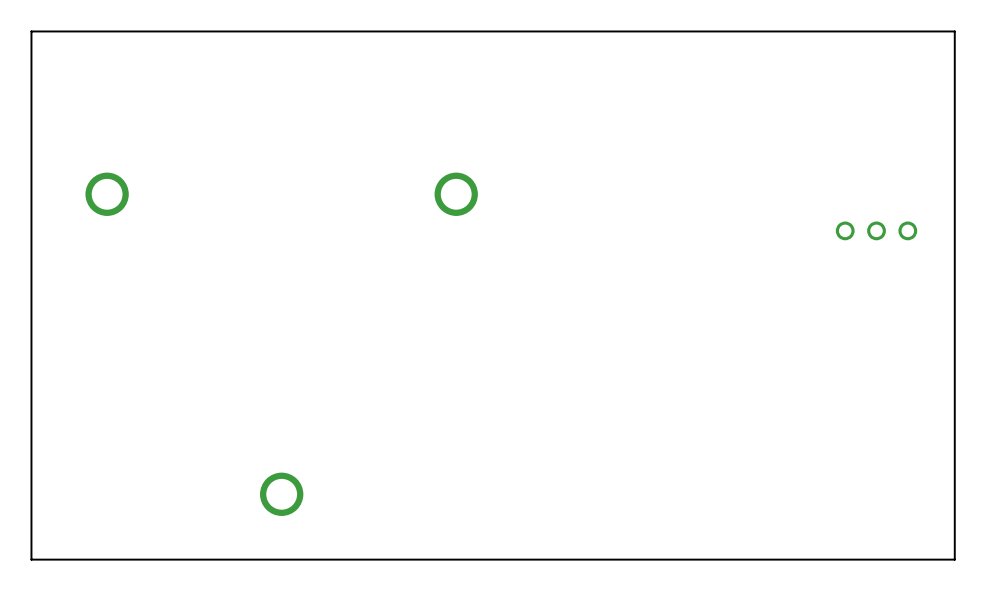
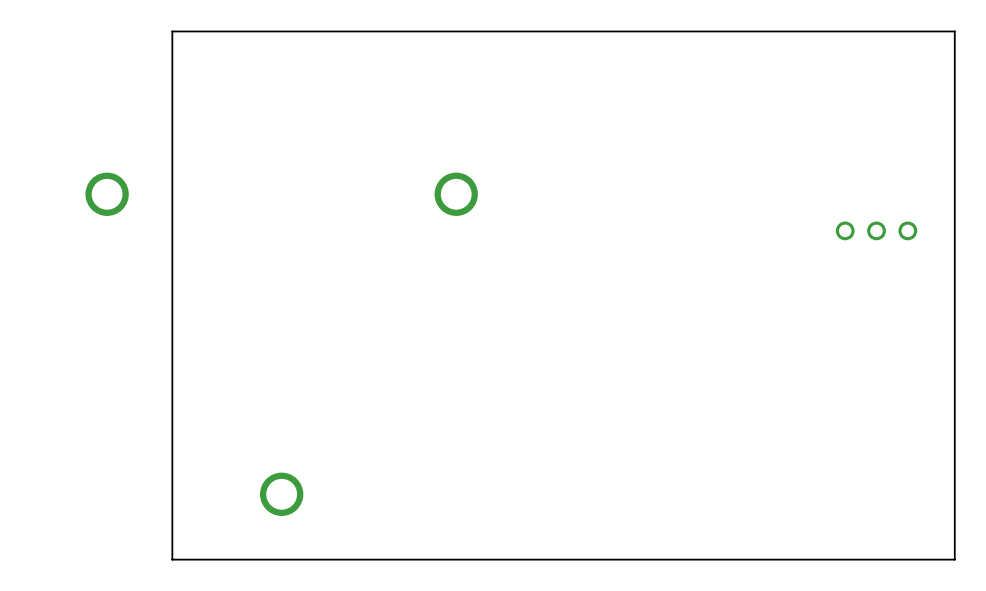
board edge: (172, 31) (31, 31) (31, 559) (172, 559) -> (172, 31) (172, 559)

